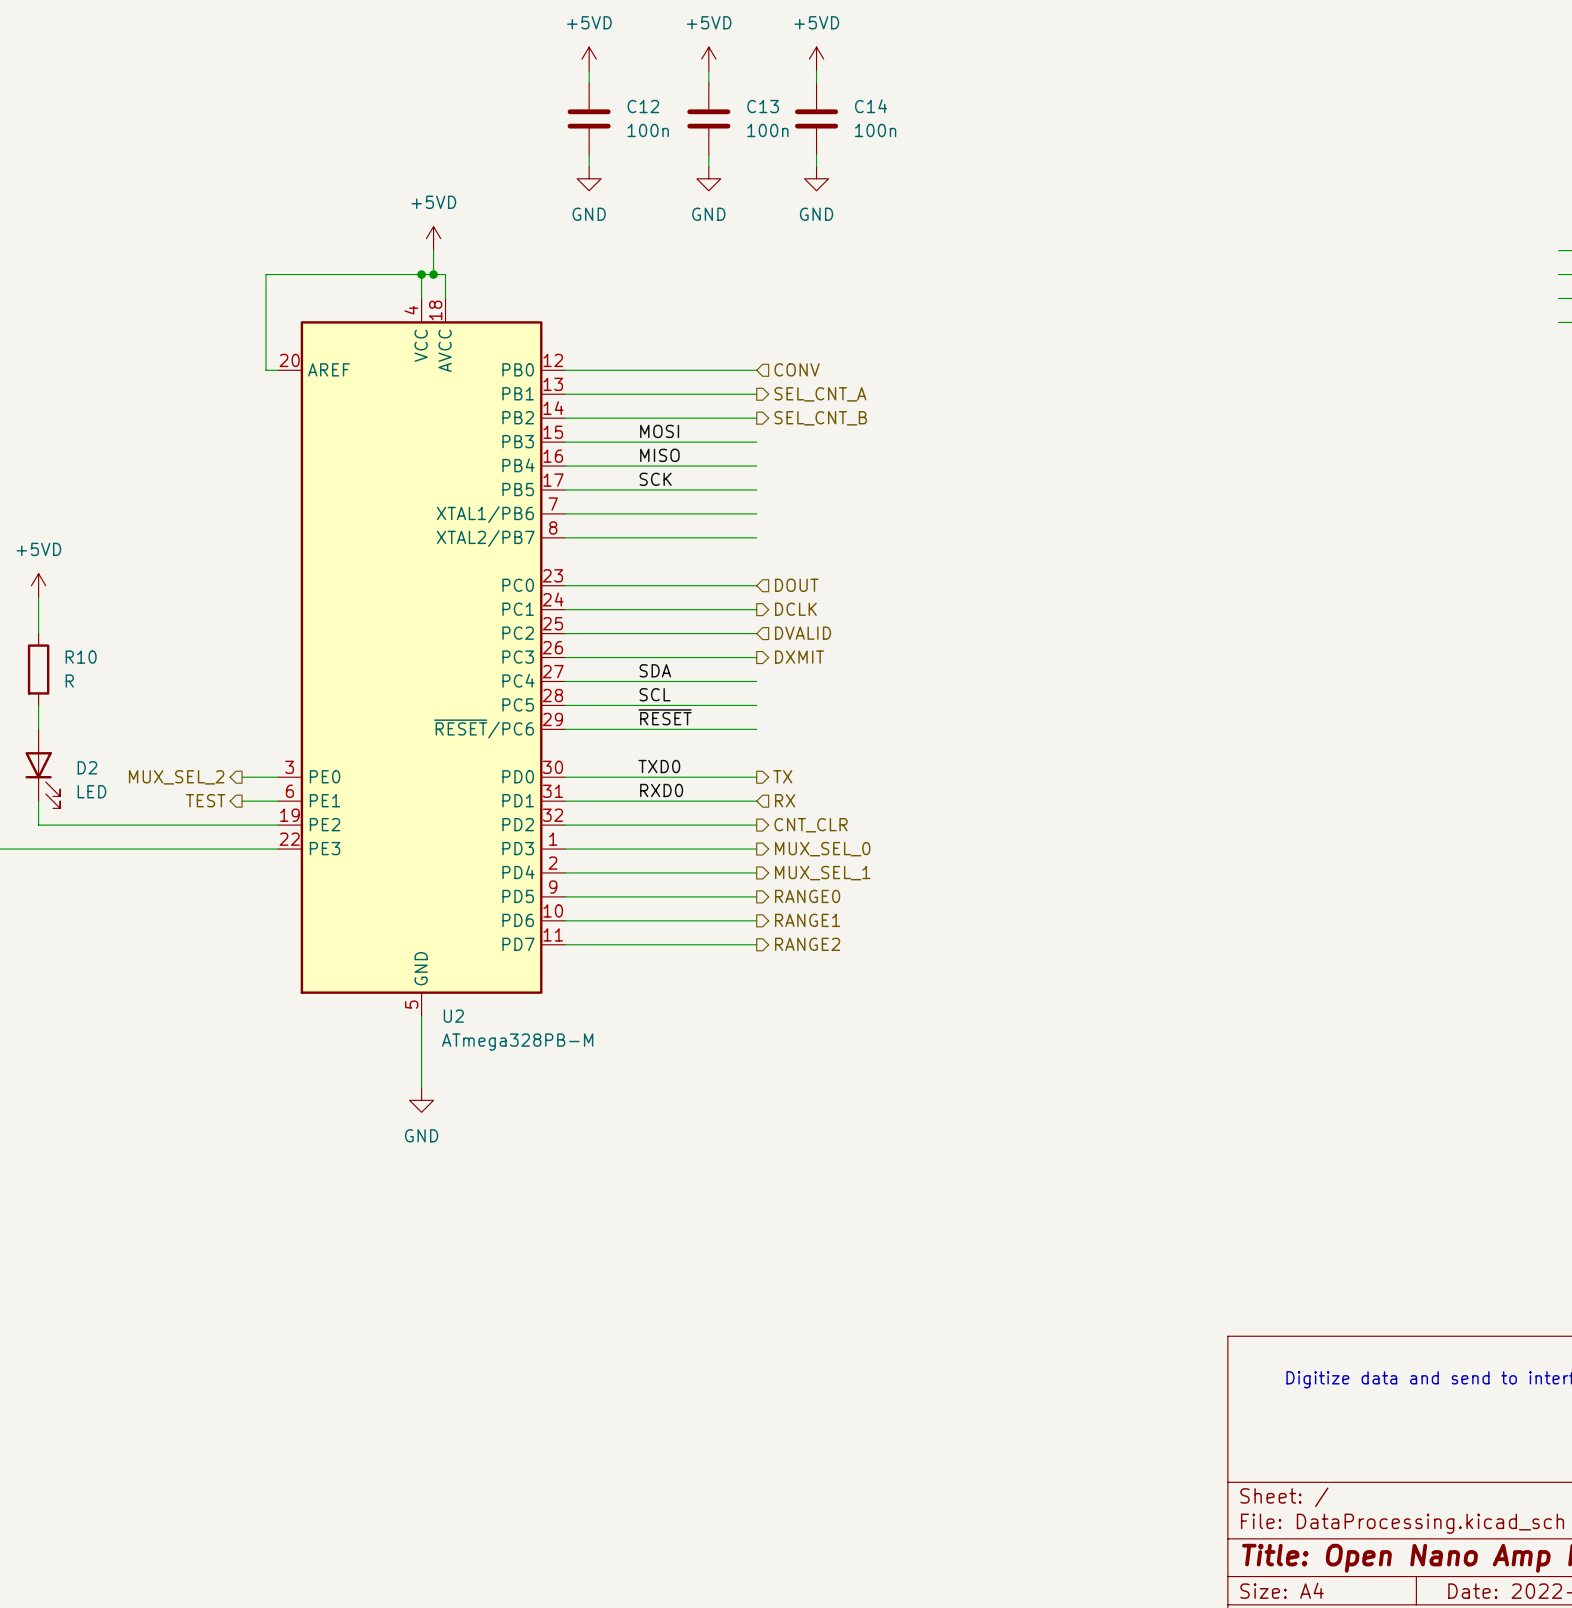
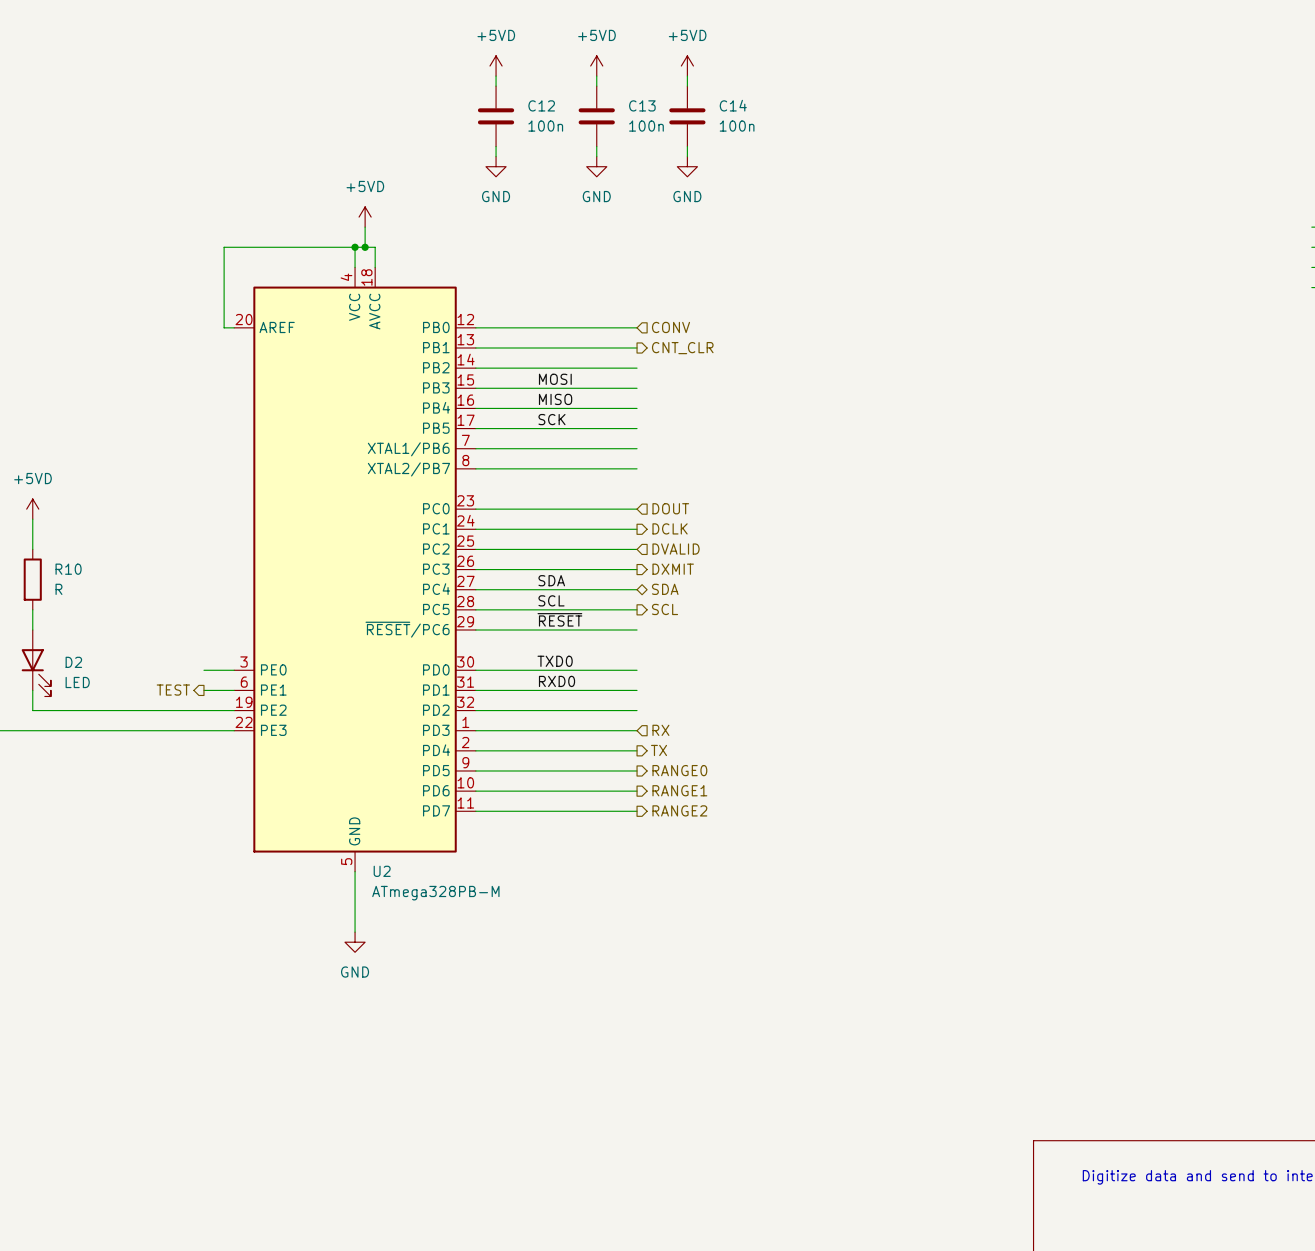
hierarchical label: SEL_CNT_A (820, 394) -> CNT_CLR (682, 348)
hierarchical label: SEL_CNT_B (820, 418) -> none
hierarchical label: none -> SDA (665, 589)
hierarchical label: none -> SCL (665, 609)
hierarchical label: TX (782, 776) -> none
hierarchical label: MUX_SEL_2 (176, 777) -> none
hierarchical label: RX (785, 800) -> none
hierarchical label: CNT_CLR (811, 825) -> none
hierarchical label shape: output (822, 849) -> input (660, 730)
hierarchical label: MUX_SEL_0 (822, 849) -> RX (660, 730)
hierarchical label: MUX_SEL_1 (822, 873) -> TX (659, 750)

